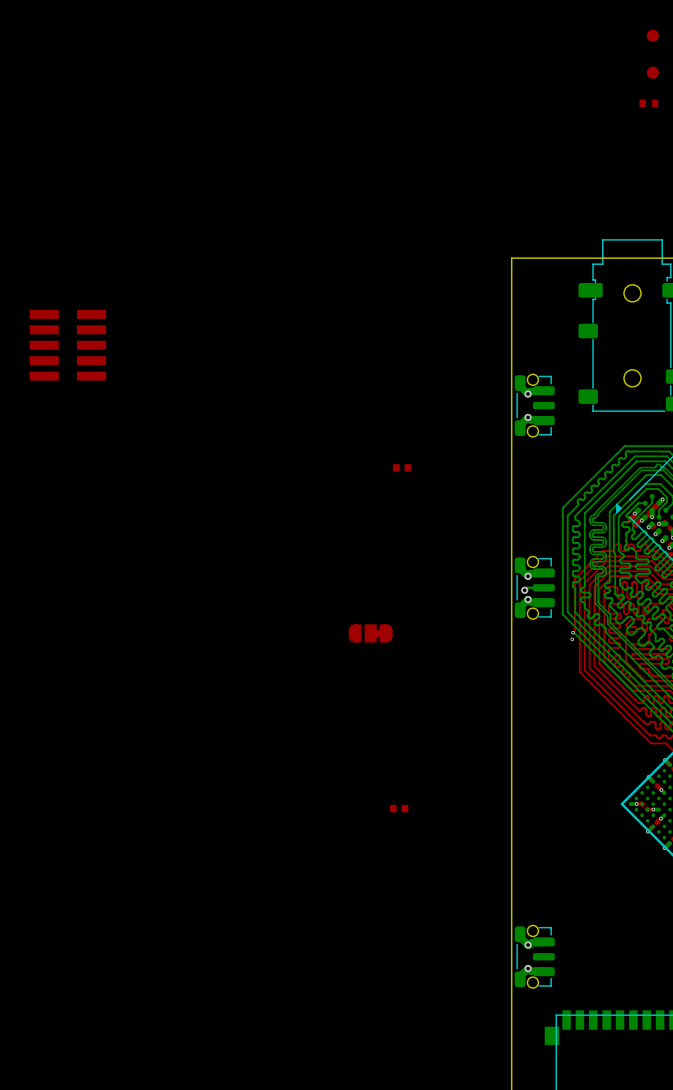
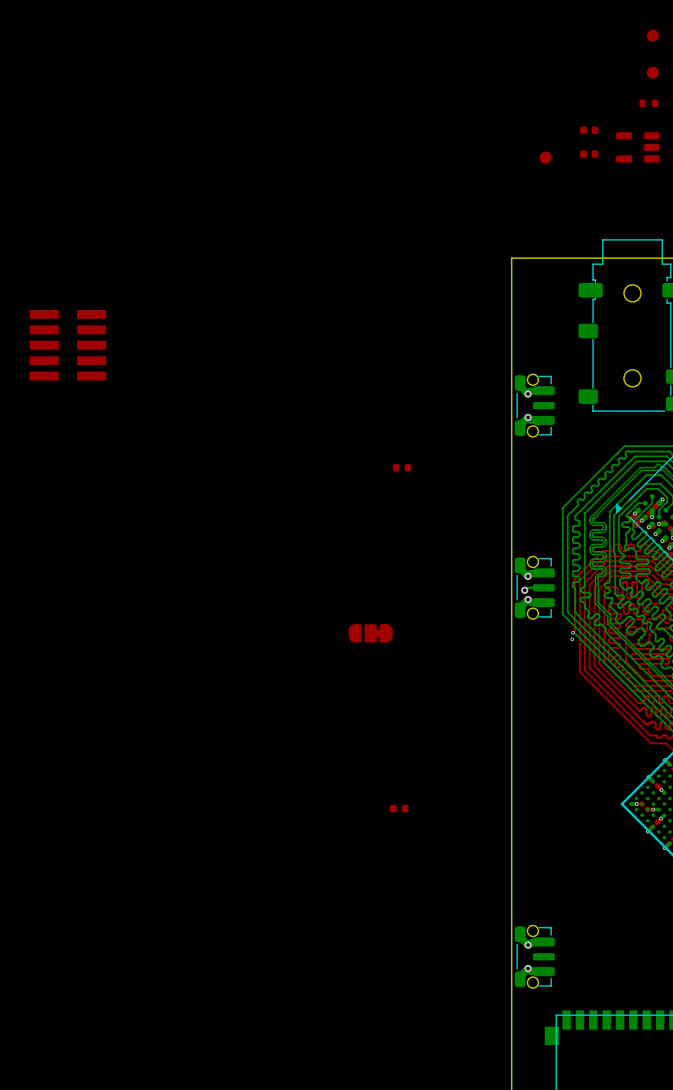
part: none -> (589, 130)
part: none -> (637, 147)
part: none -> (589, 154)
part: none -> (545, 157)

